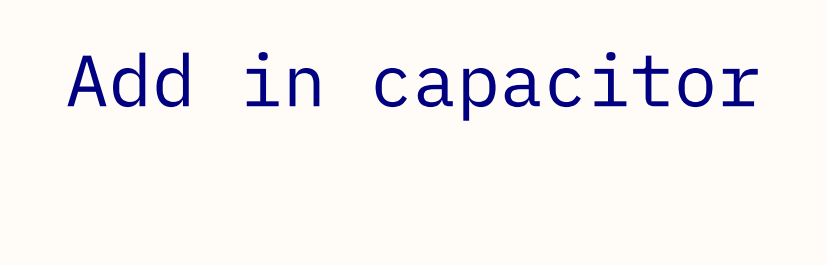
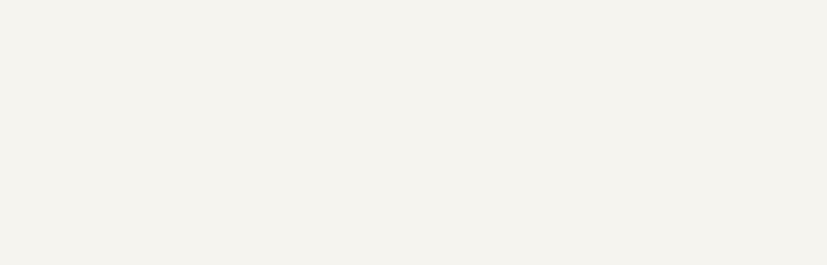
text: Add in capacitor (412, 86) -> none

